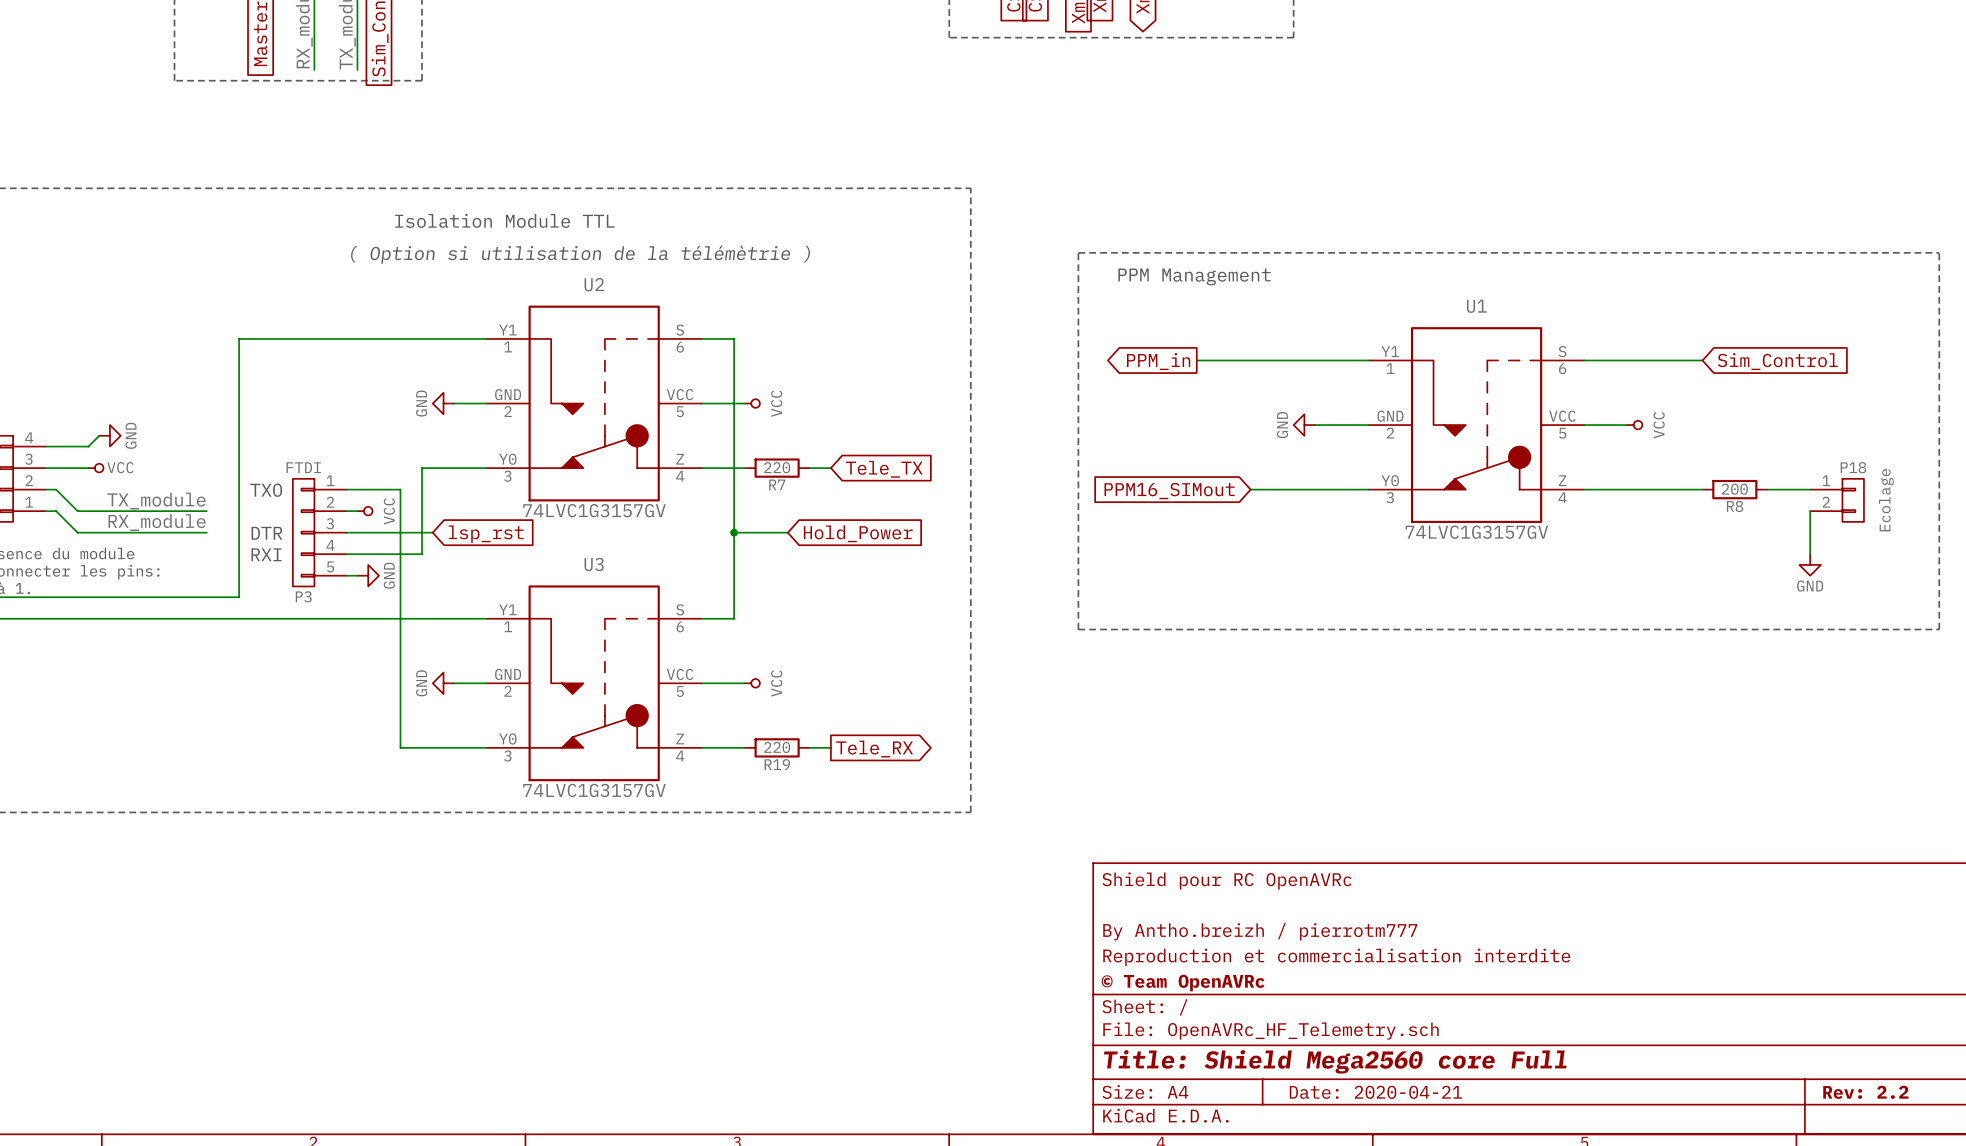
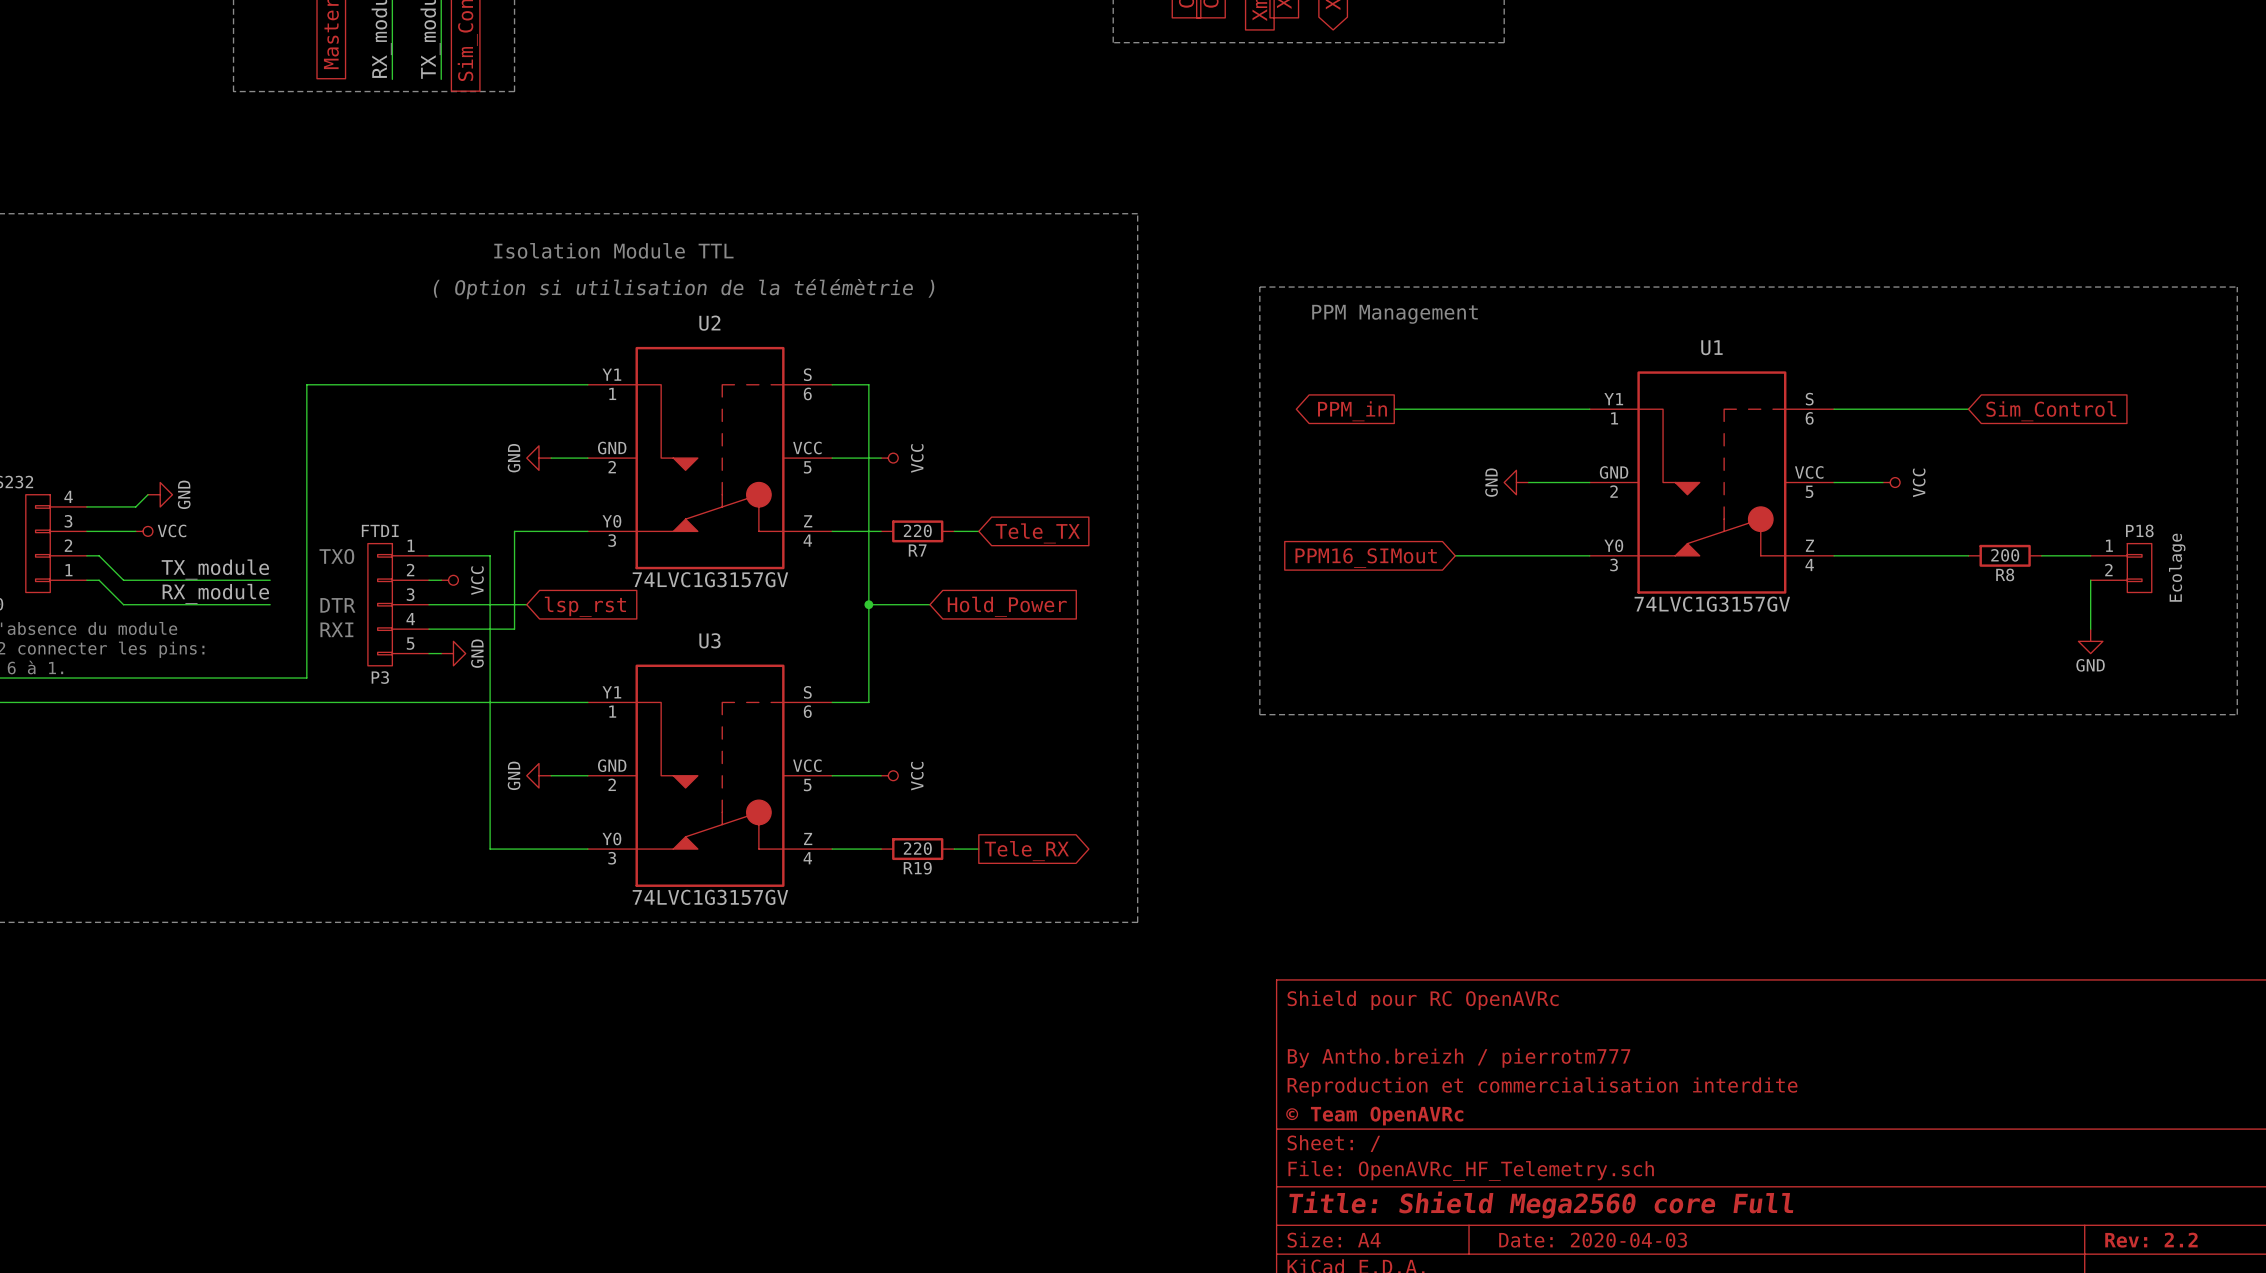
title block: Date: 2020-04-21 (1375, 1092) -> Date: 2020-04-03 (1593, 1240)

